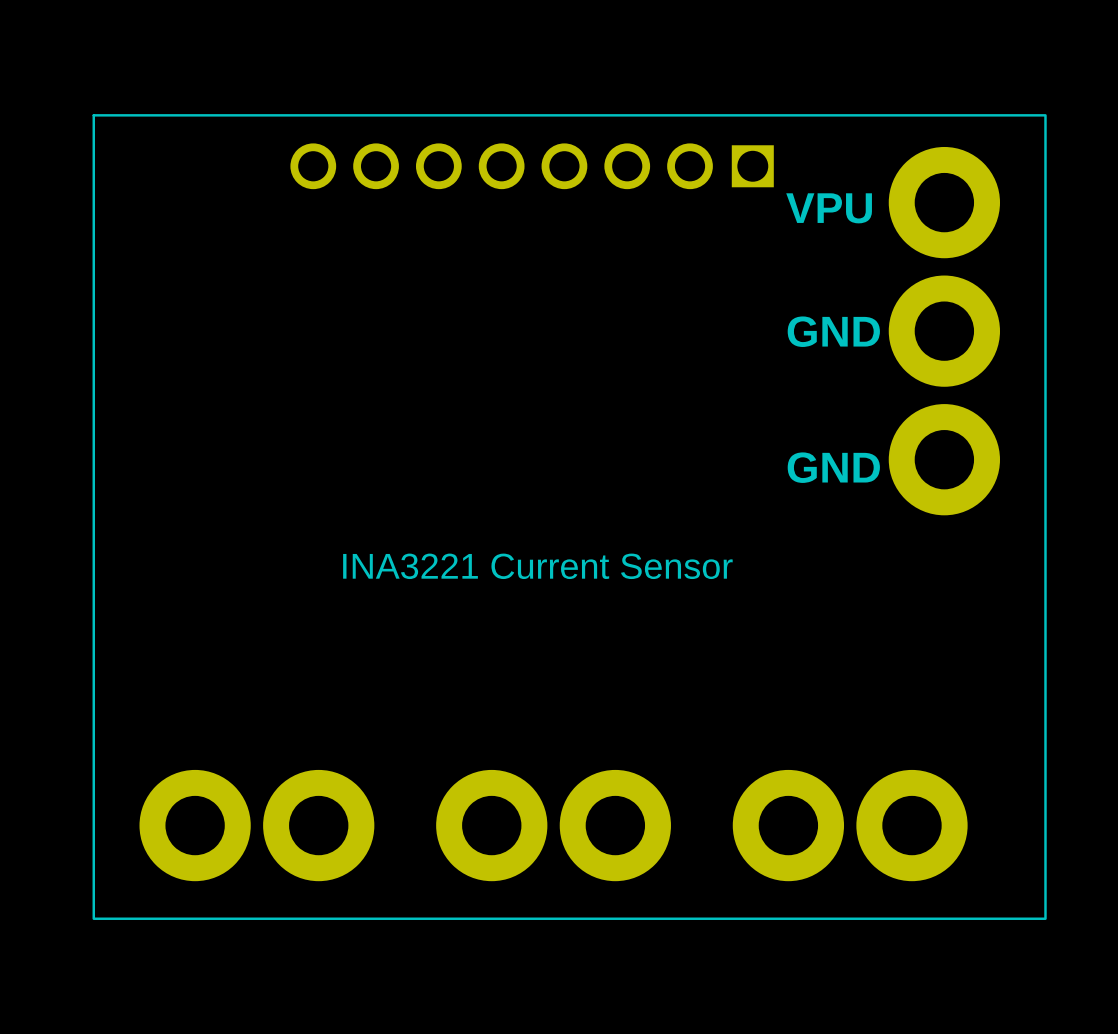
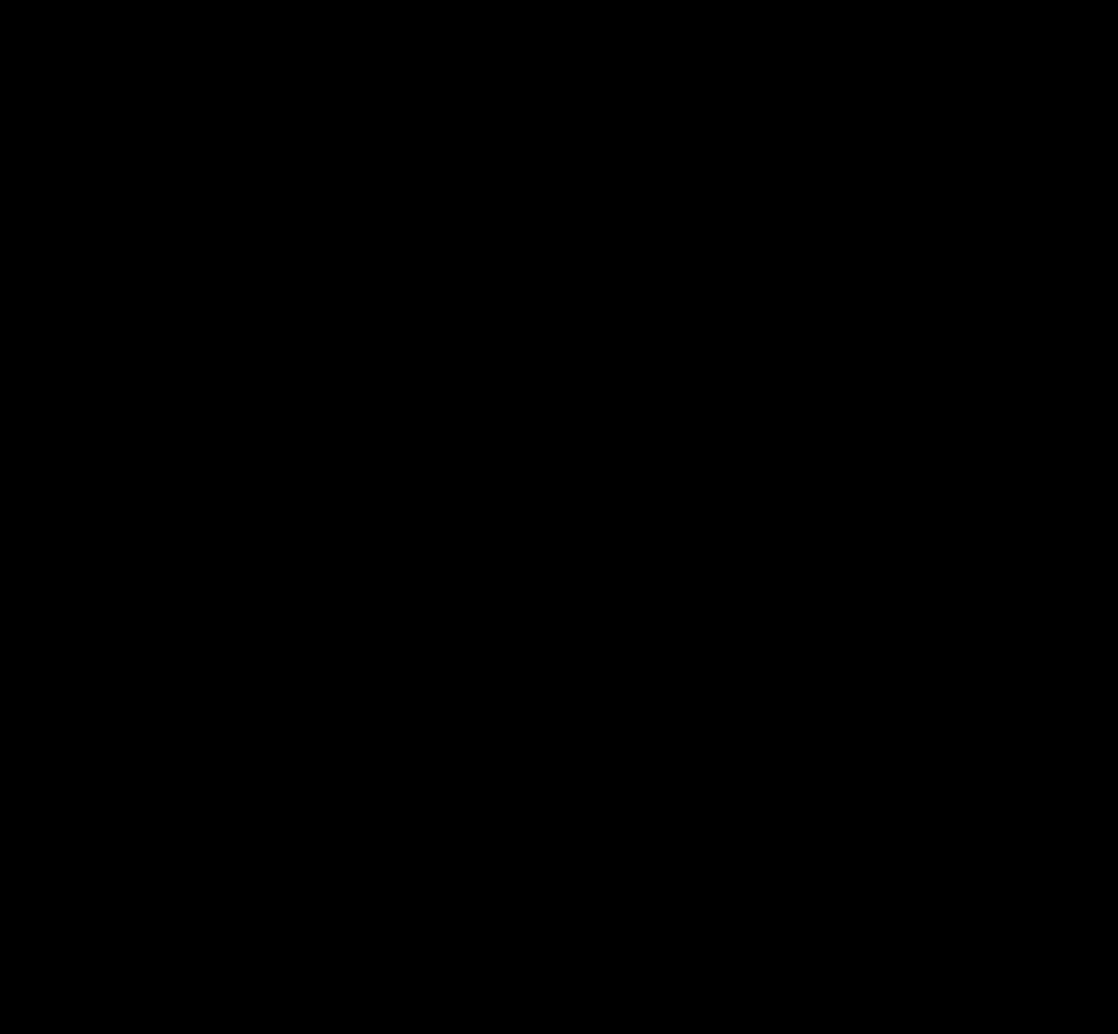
part: (569, 517) -> none

